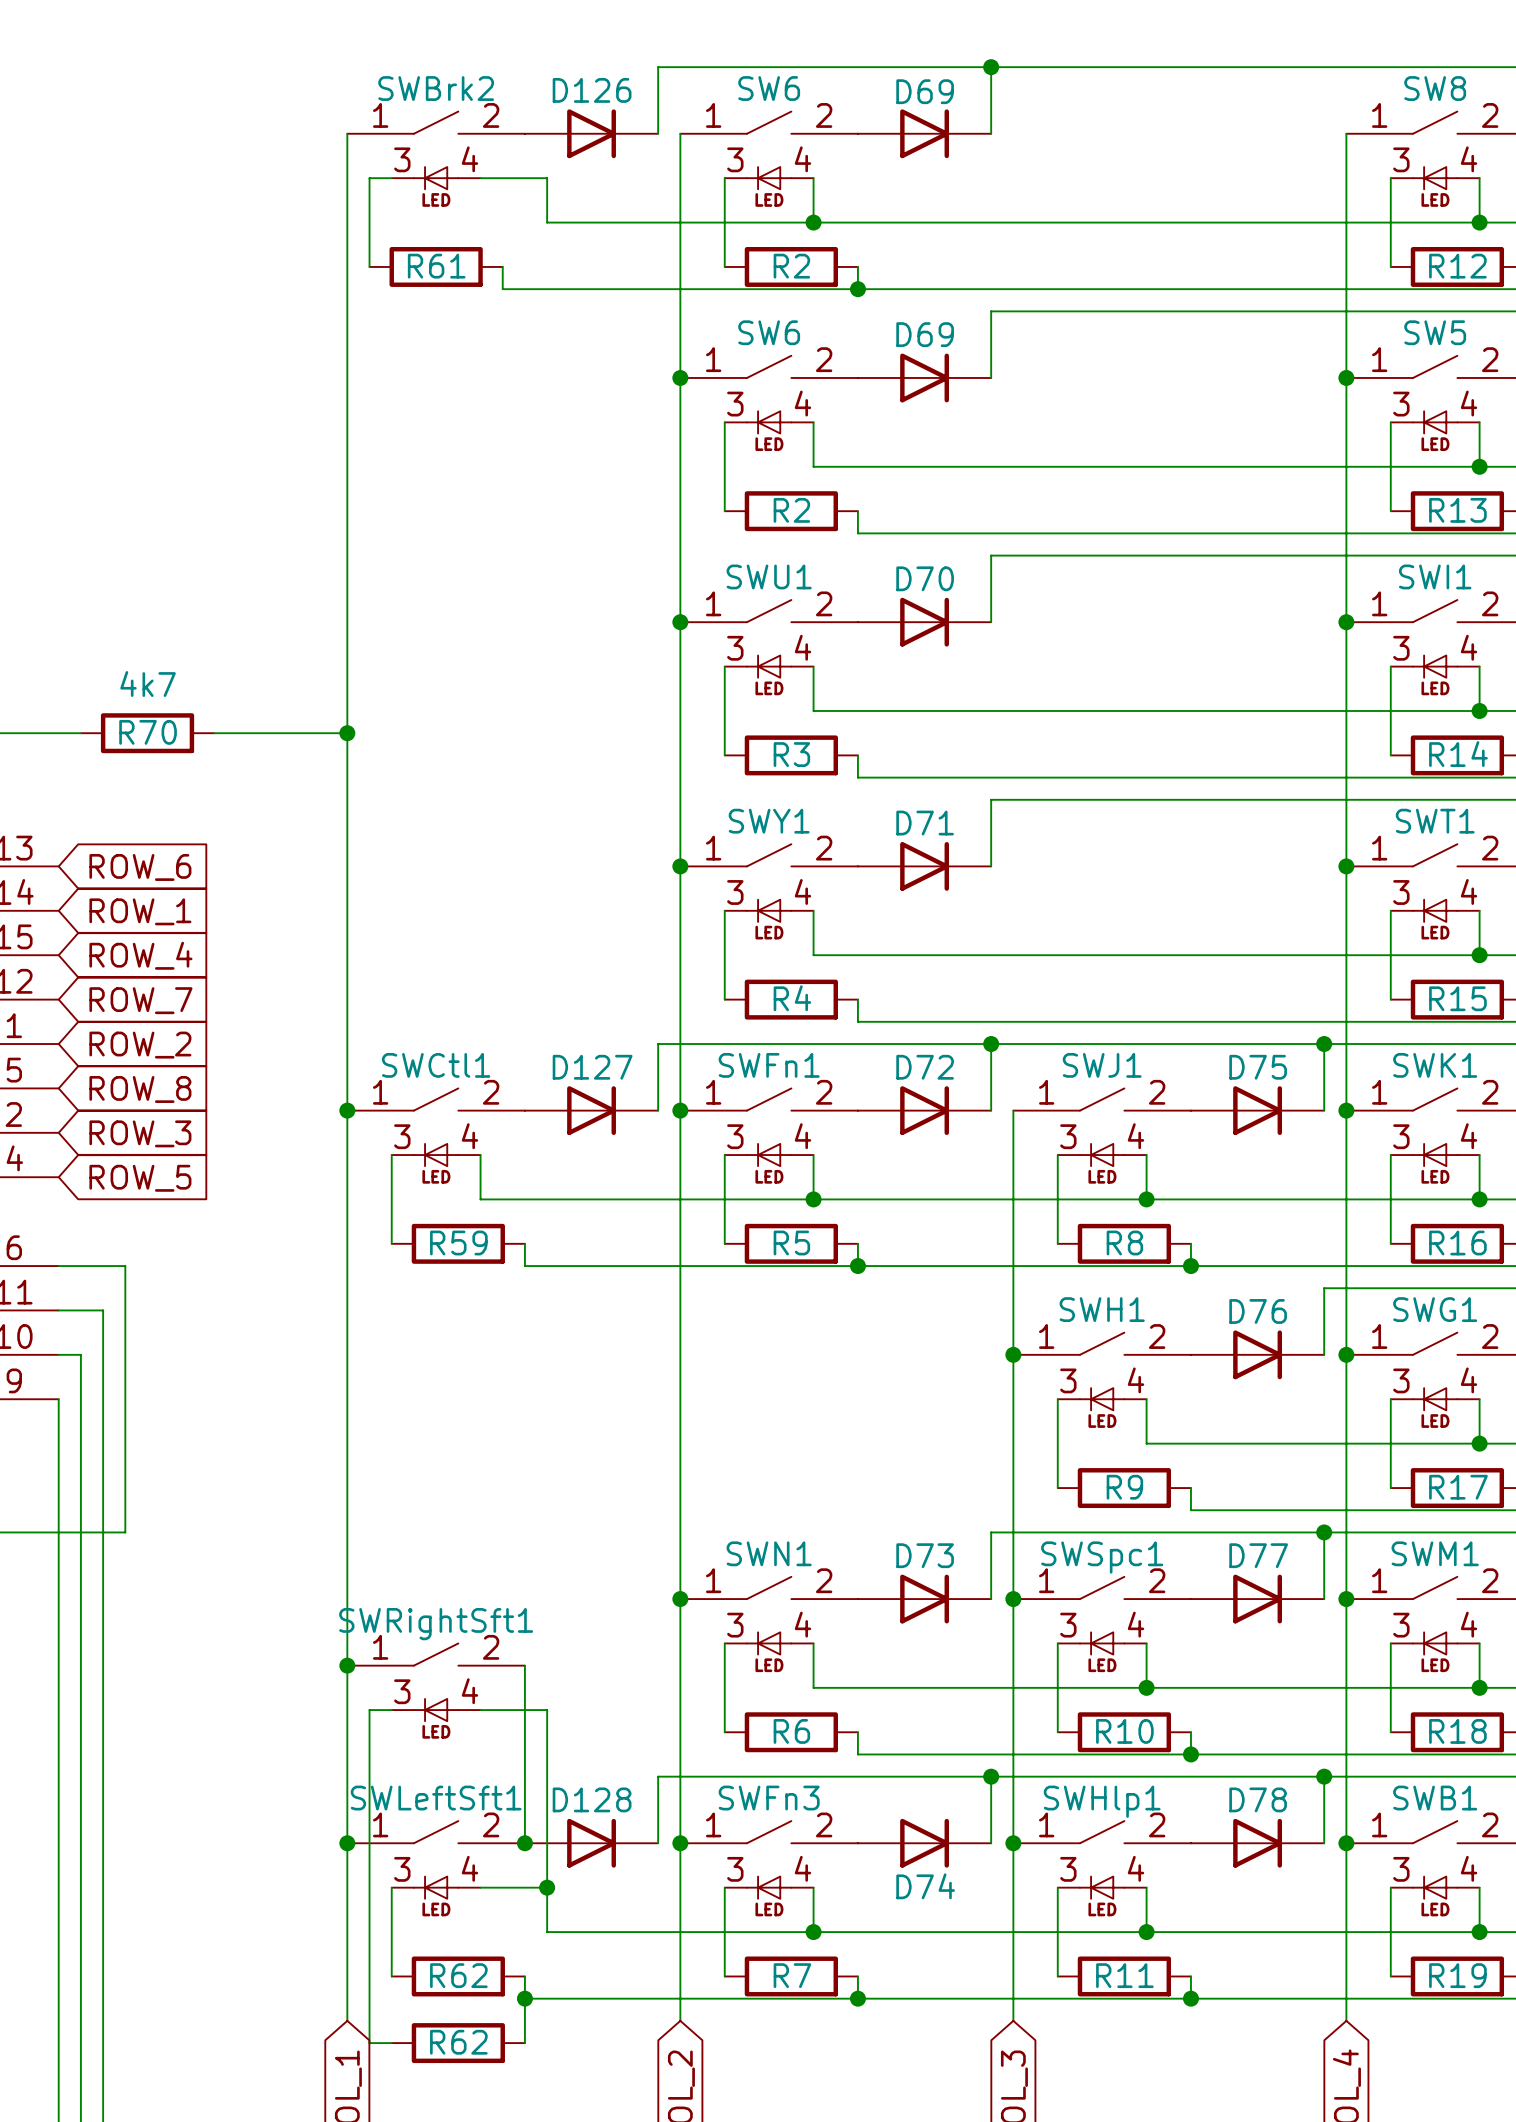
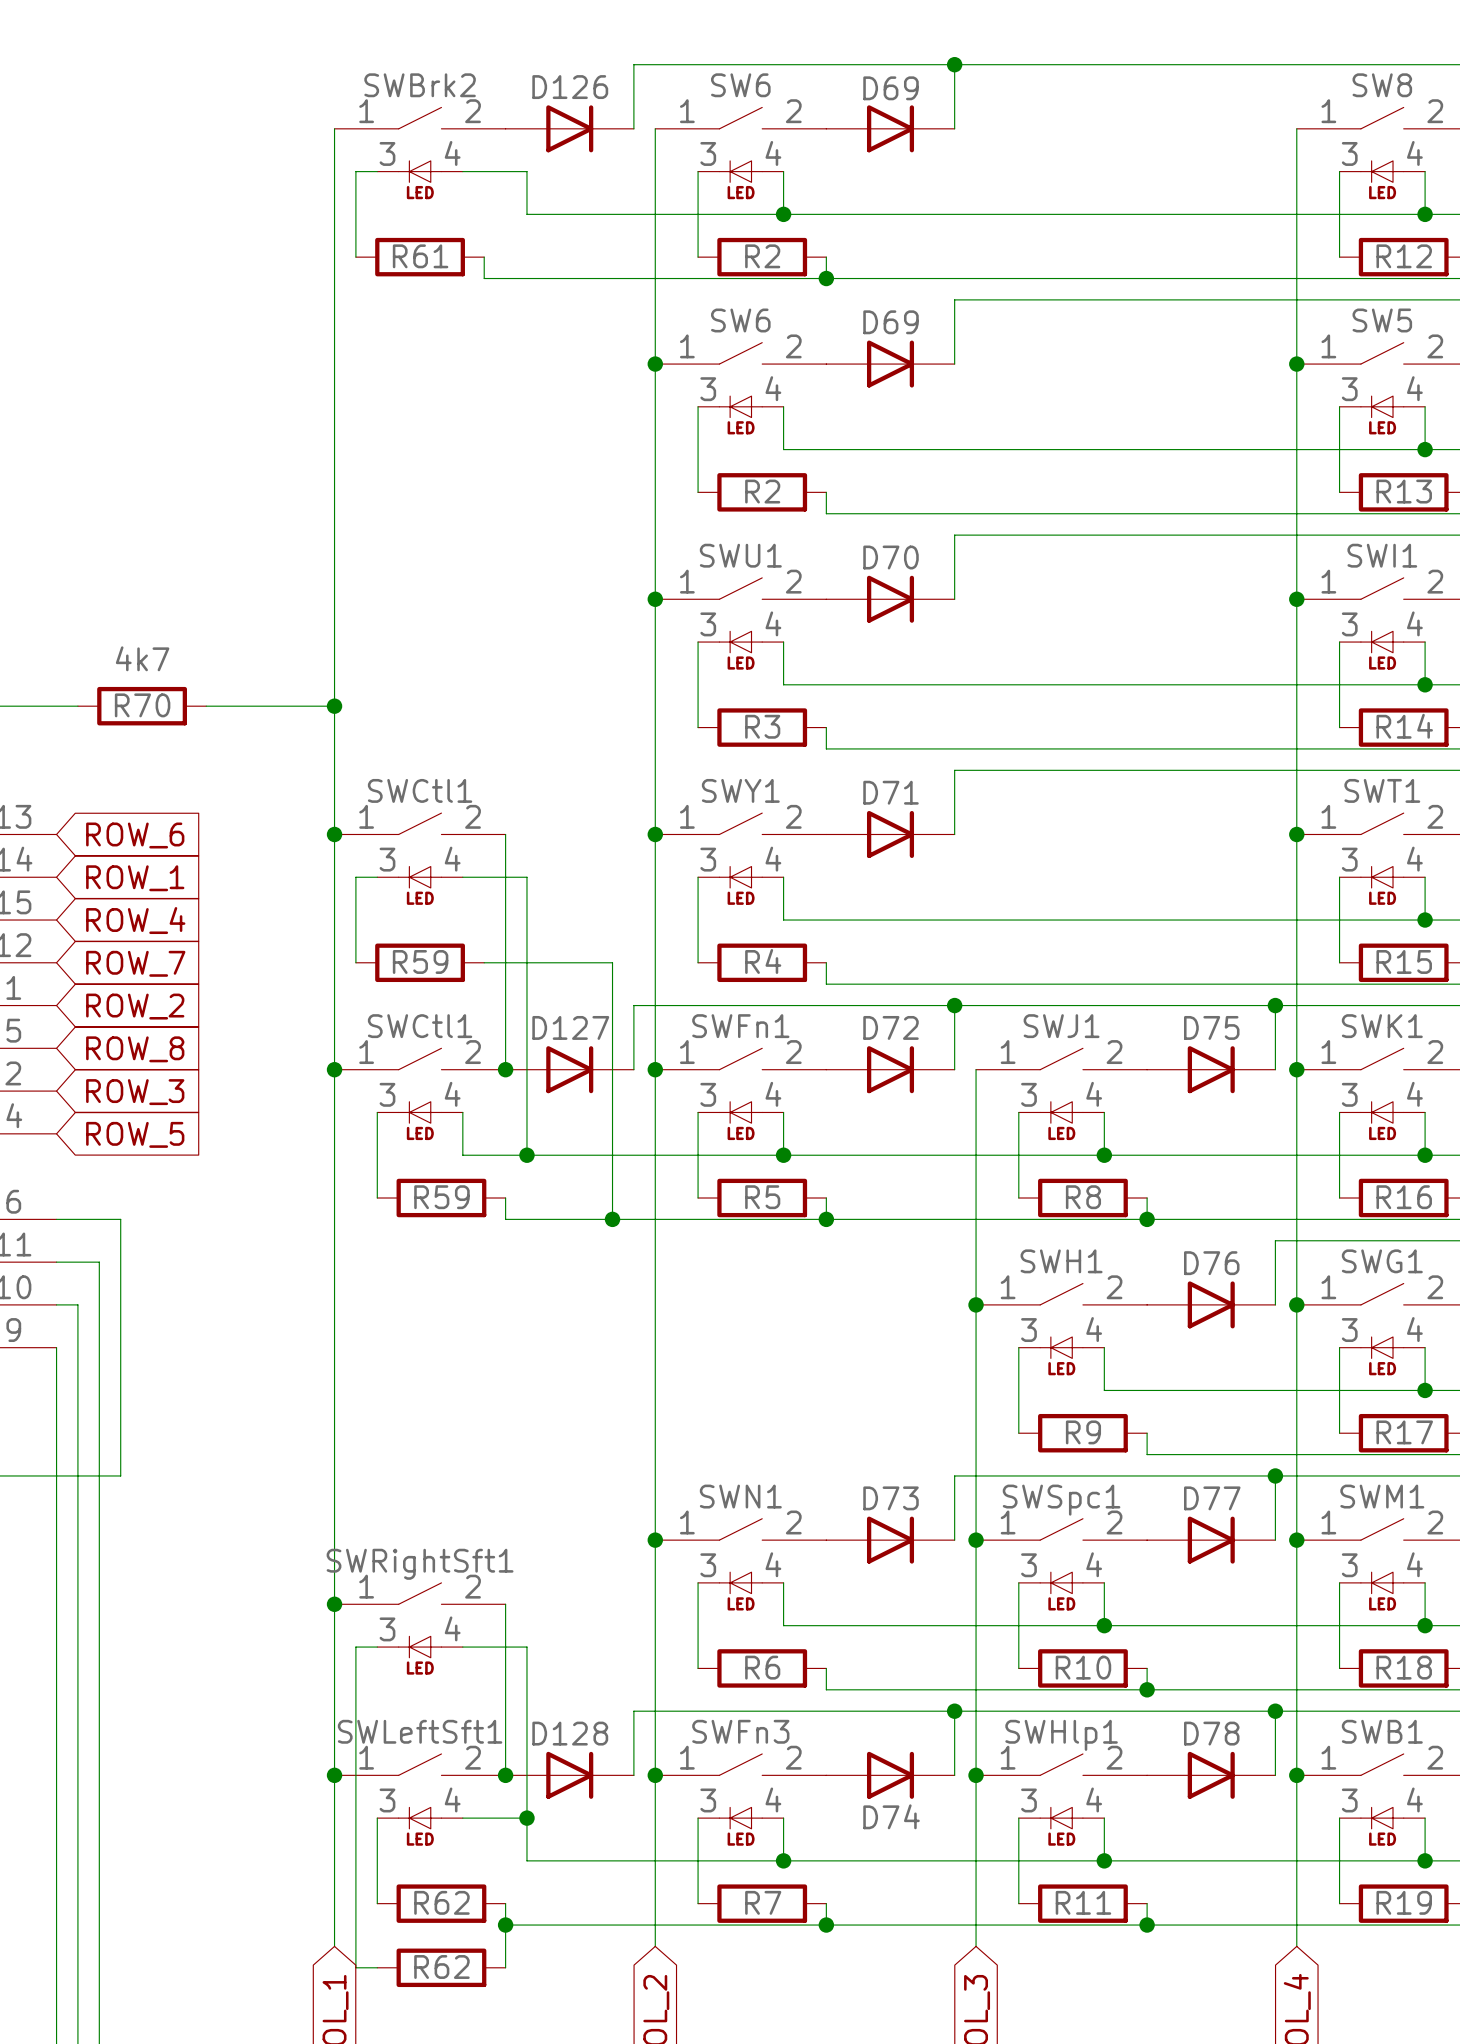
junction: none -> (334, 834)
wire: none -> (505, 834) (505, 1069)
SWCtl1: none -> (420, 850)
wire: none -> (377, 877) (355, 877) (355, 962)
wire: none -> (462, 877) (526, 877) (526, 1155)
R59: none -> (420, 962)
wire: none -> (484, 962) (612, 962) (612, 1219)
junction: none -> (505, 1069)
junction: none -> (526, 1155)
junction: none -> (612, 1219)

